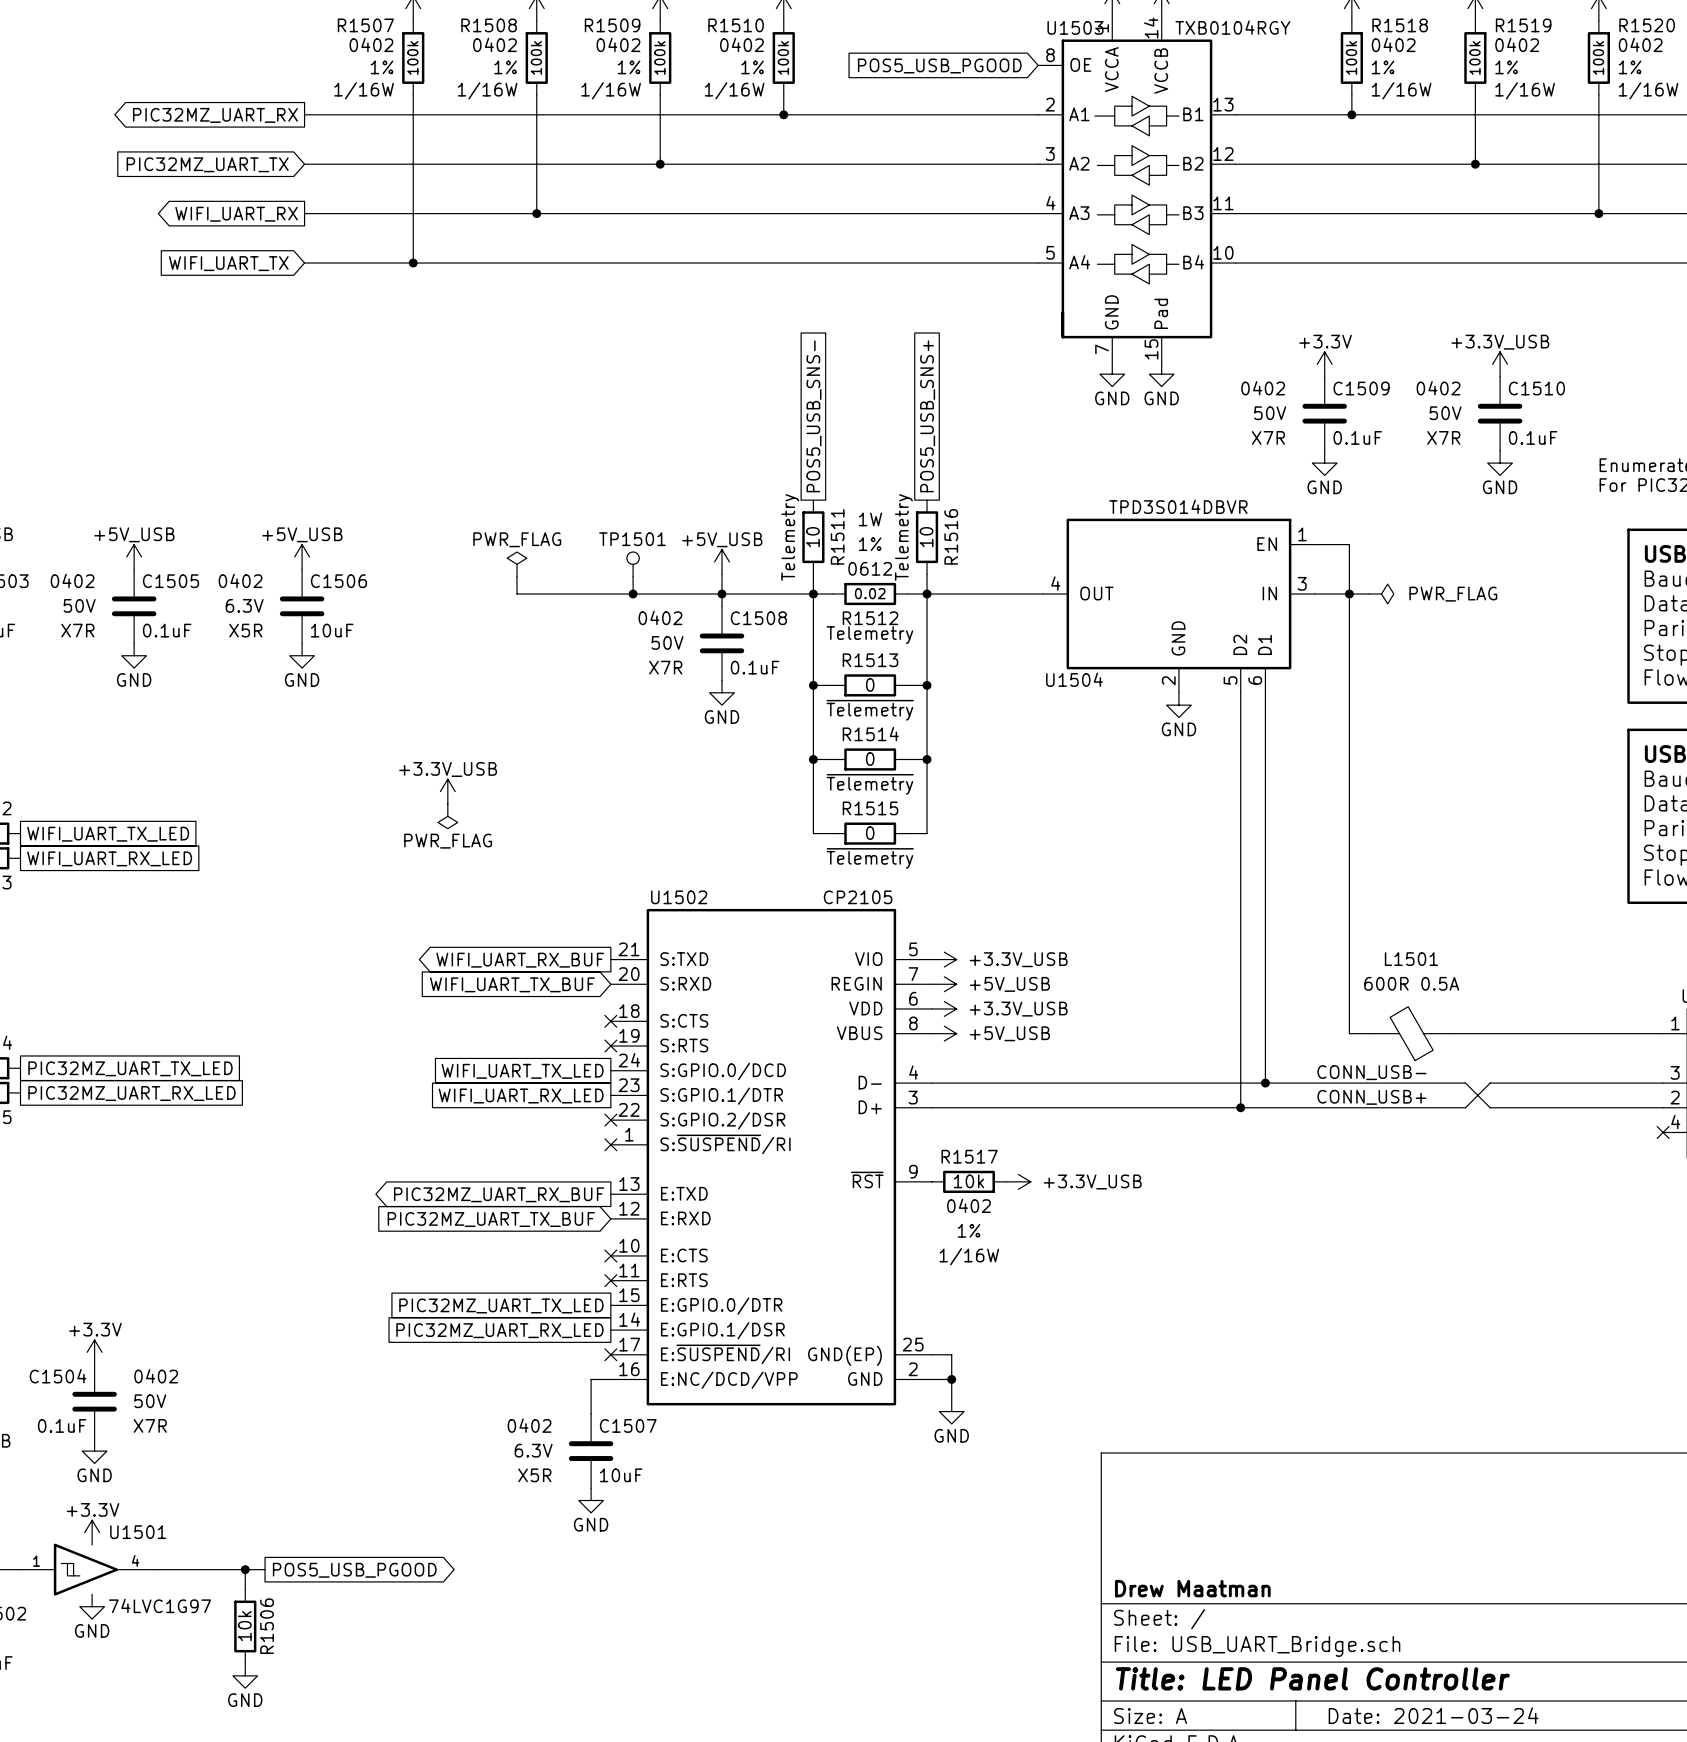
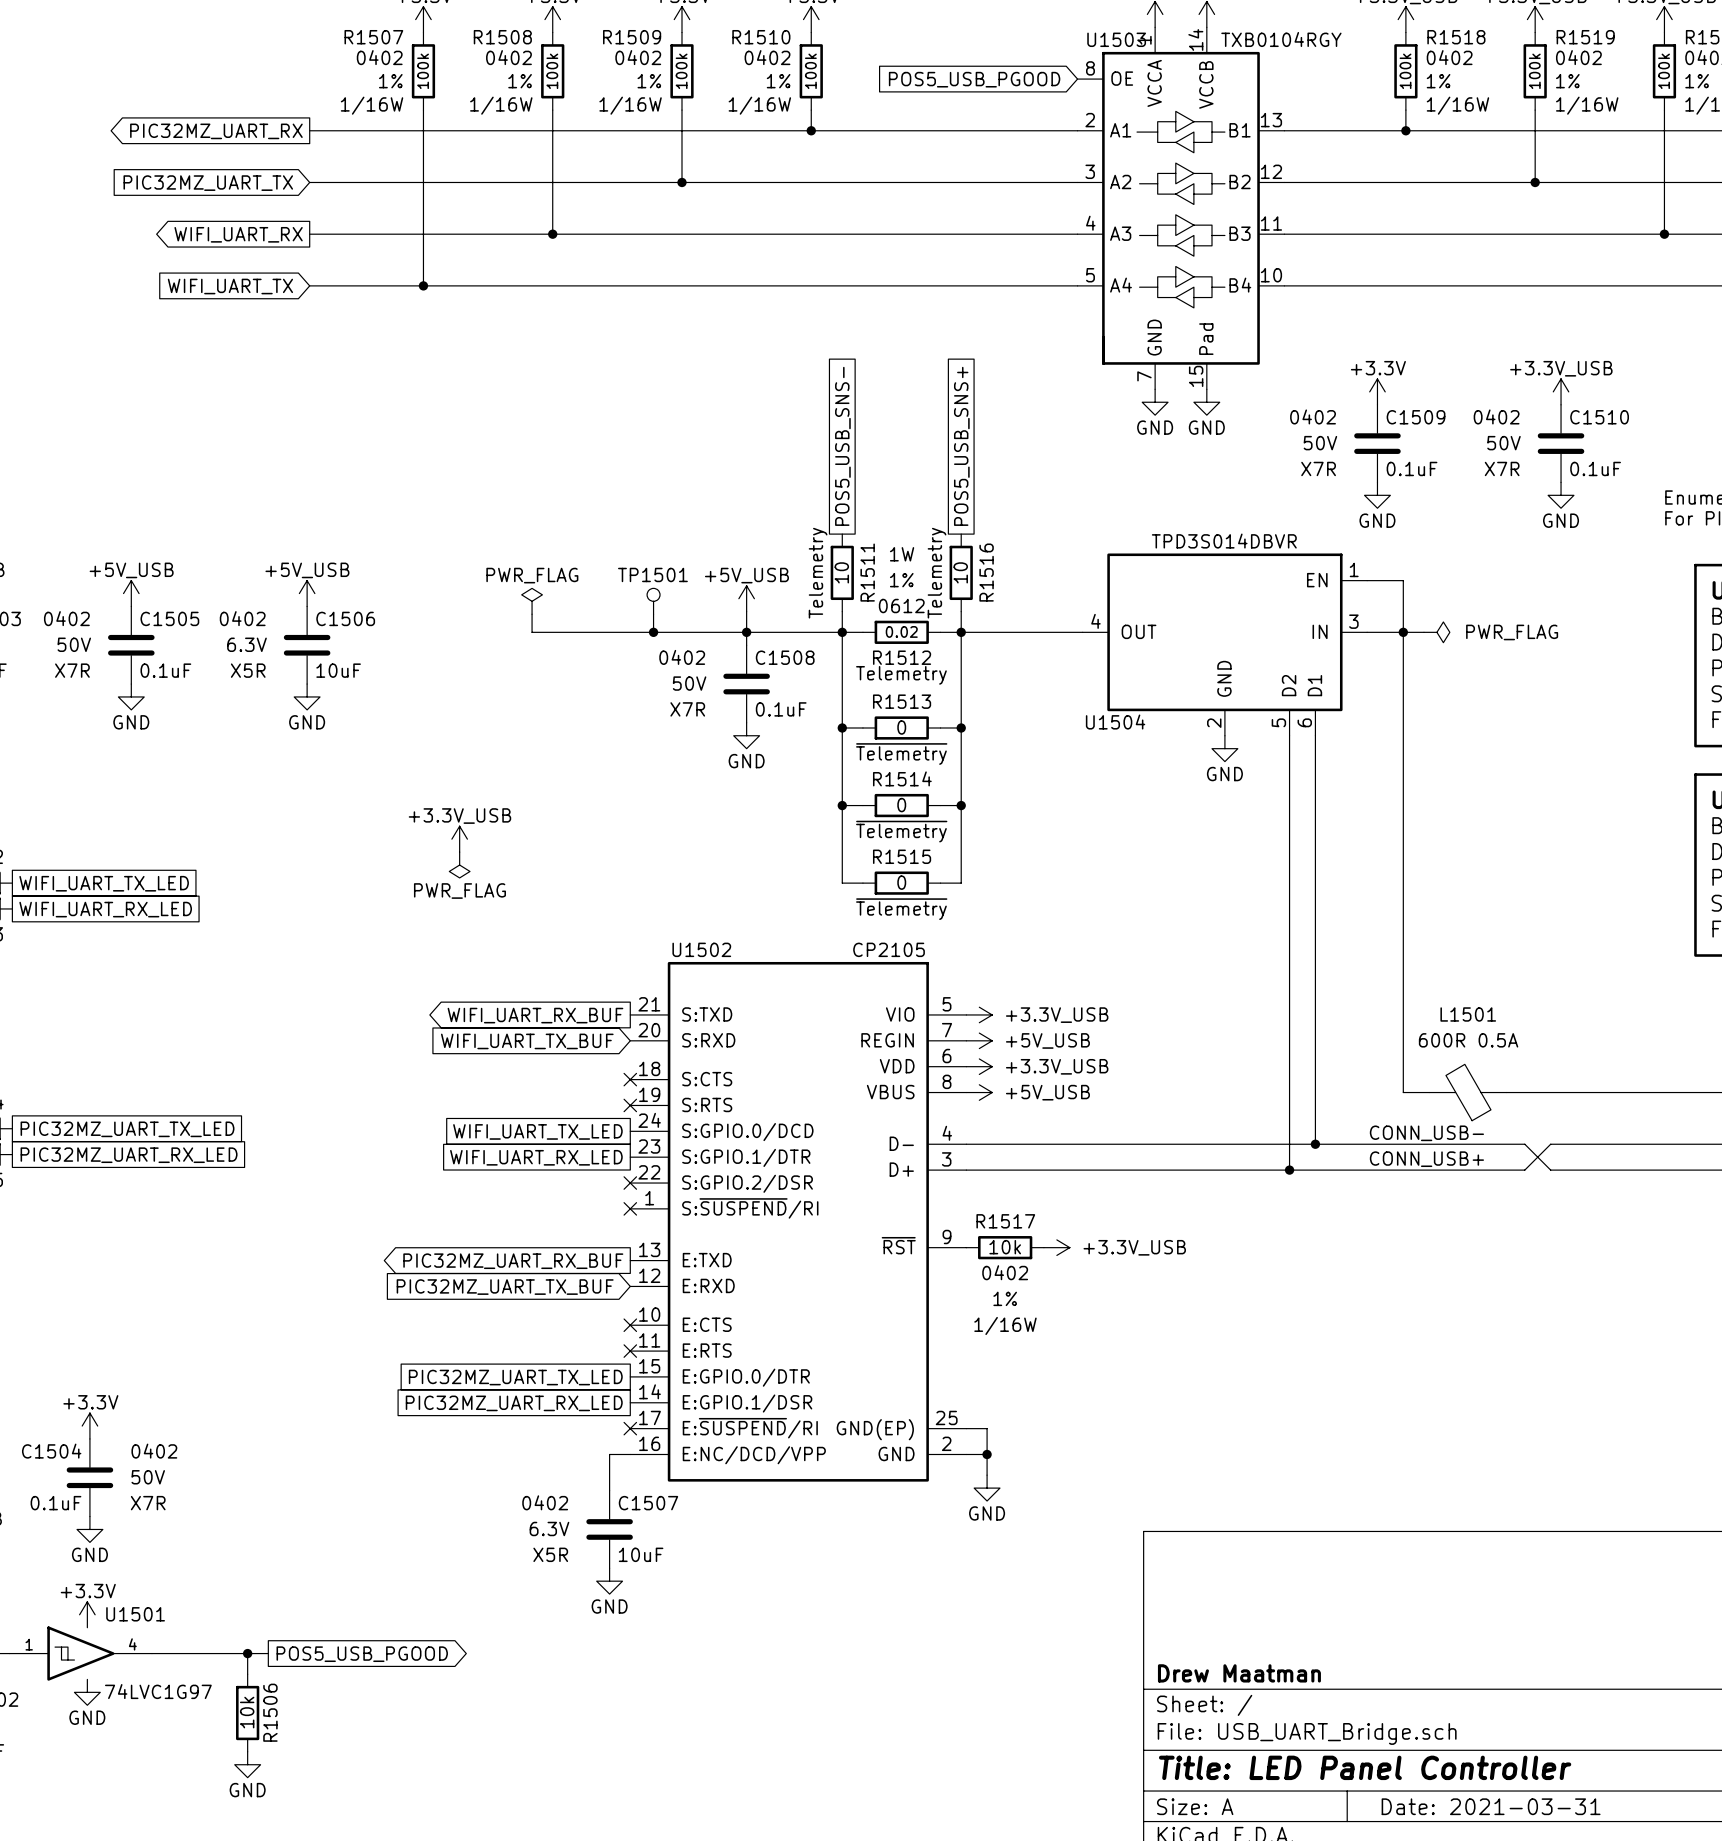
title block: Date: 2021-03-24 (1433, 1715) -> Date: 2021-03-31 (1491, 1806)

